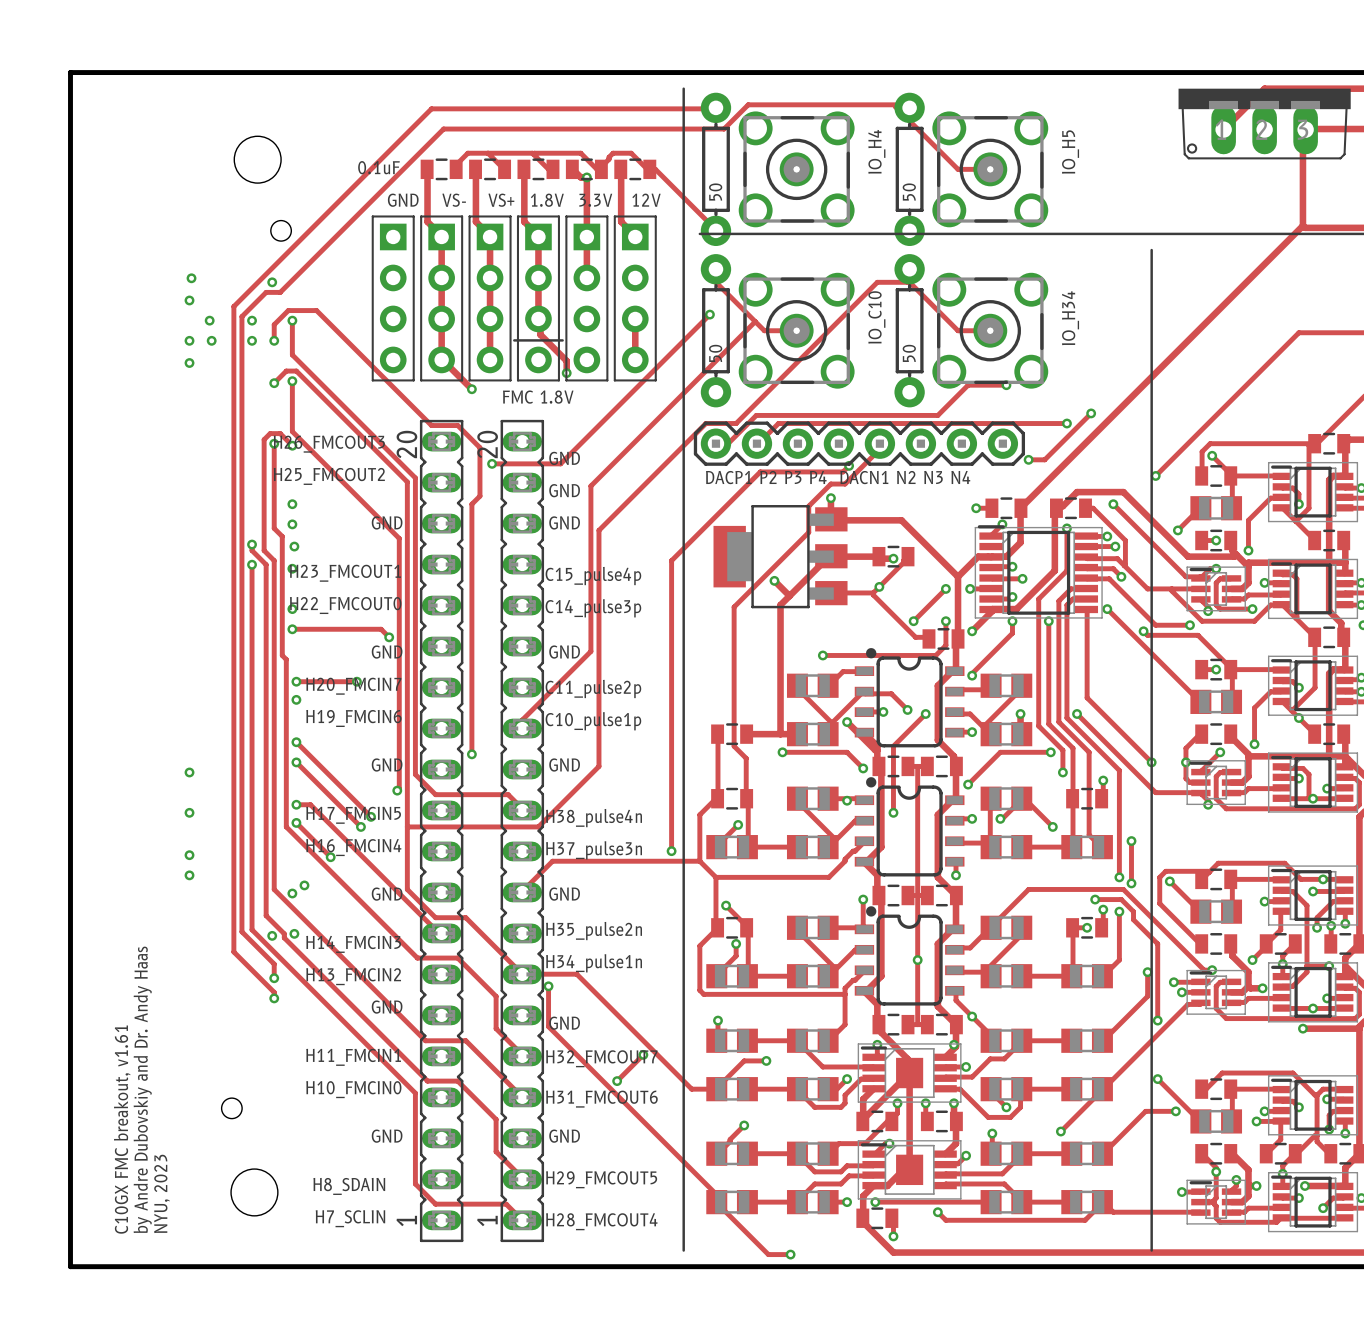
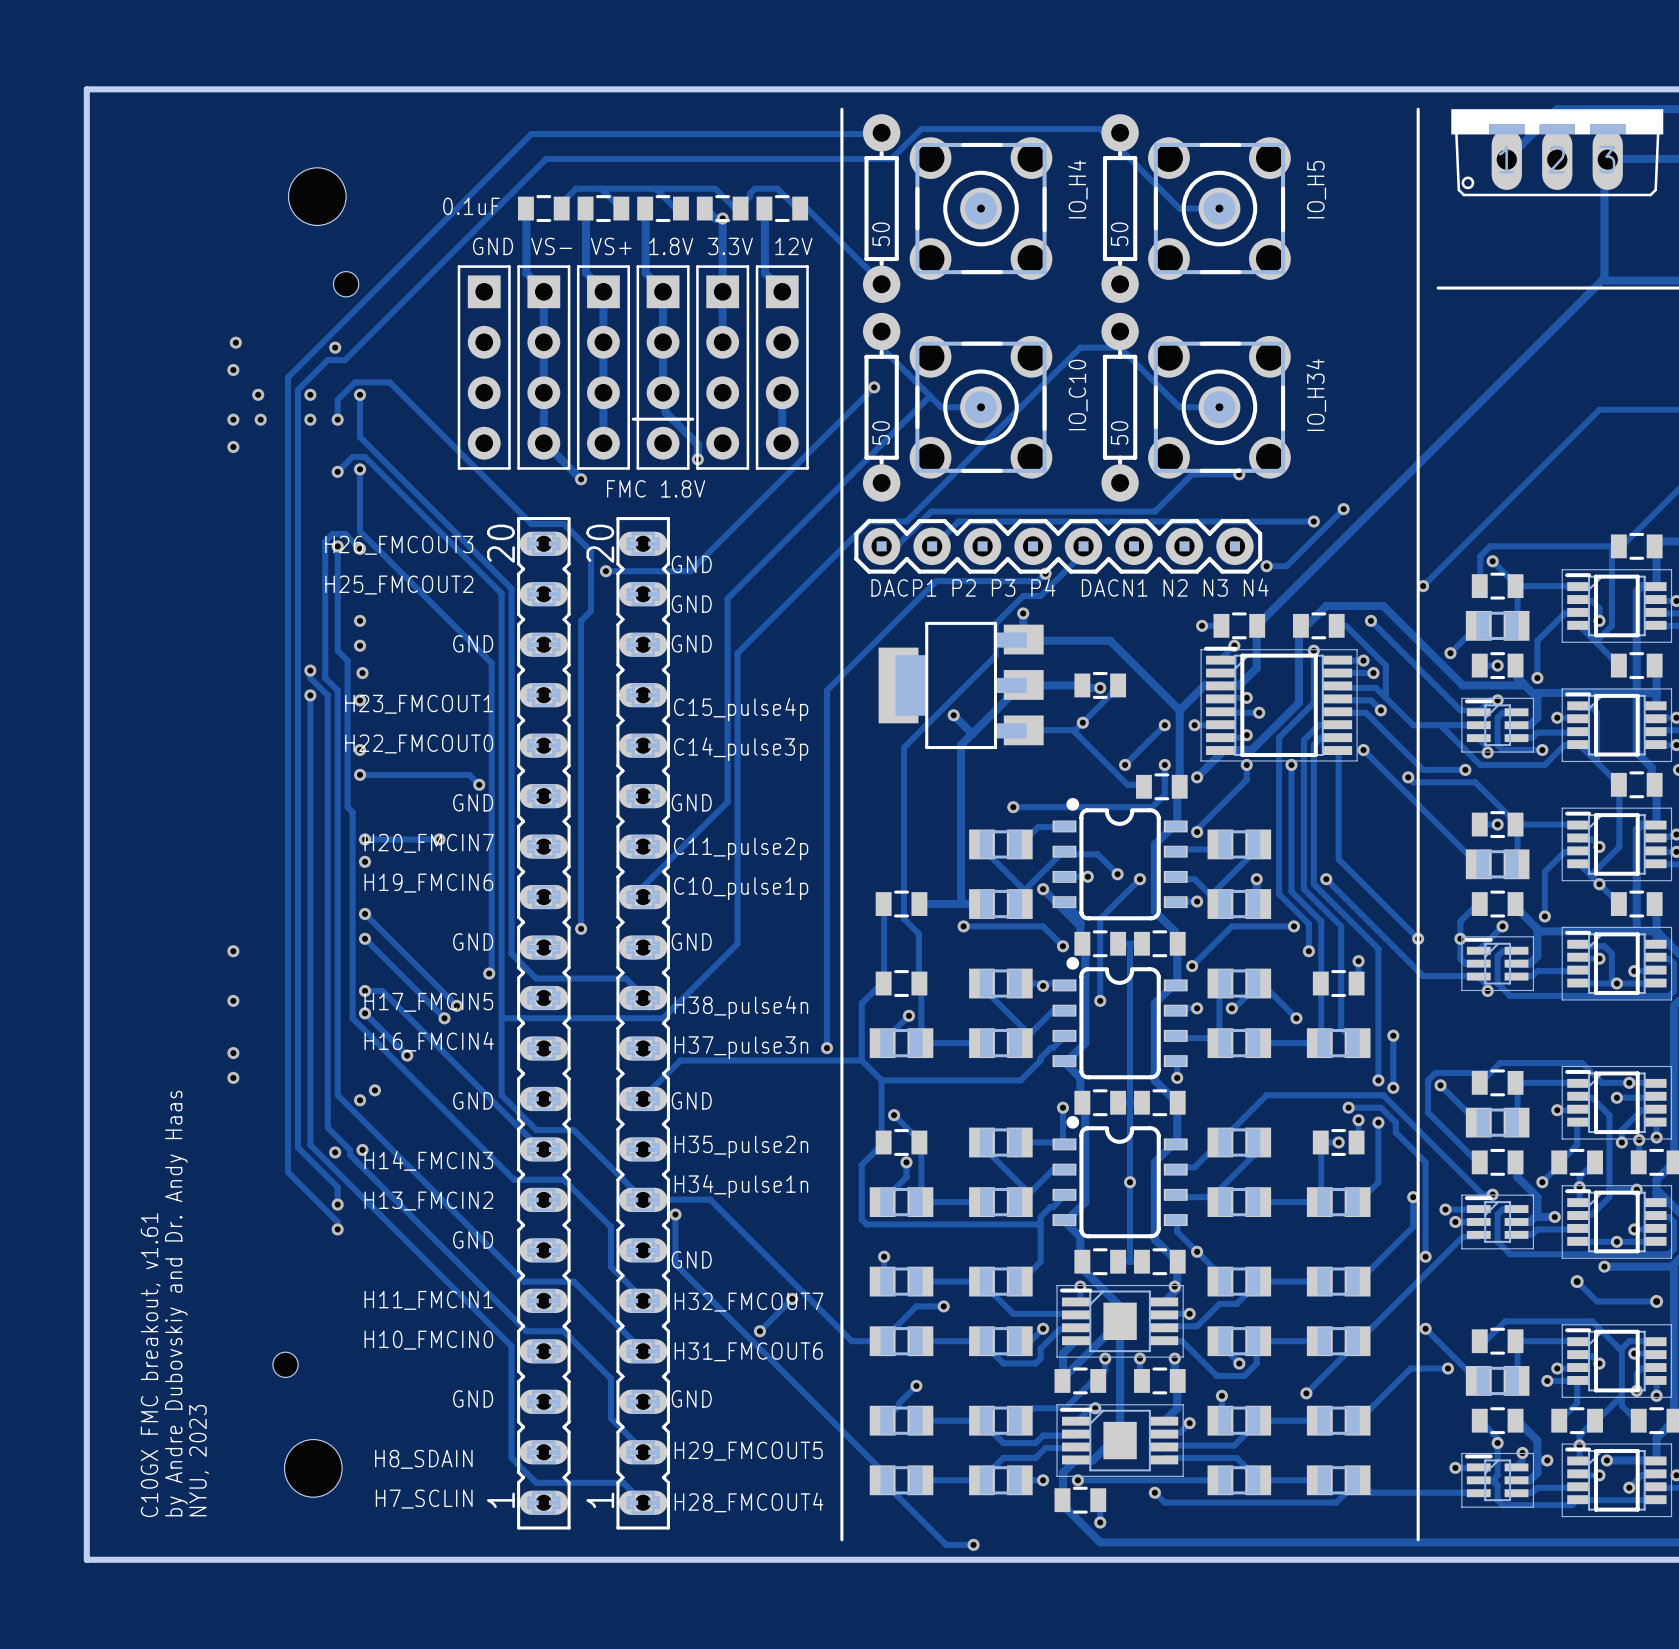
line: none -> (1418, 109) (1418, 307)
line: (699, 233) (1167, 233) -> none
track: none -> (1577, 1281) (1597, 1301) (1656, 1301)
via: none -> (1577, 1281)
via: none -> (1656, 1301)

